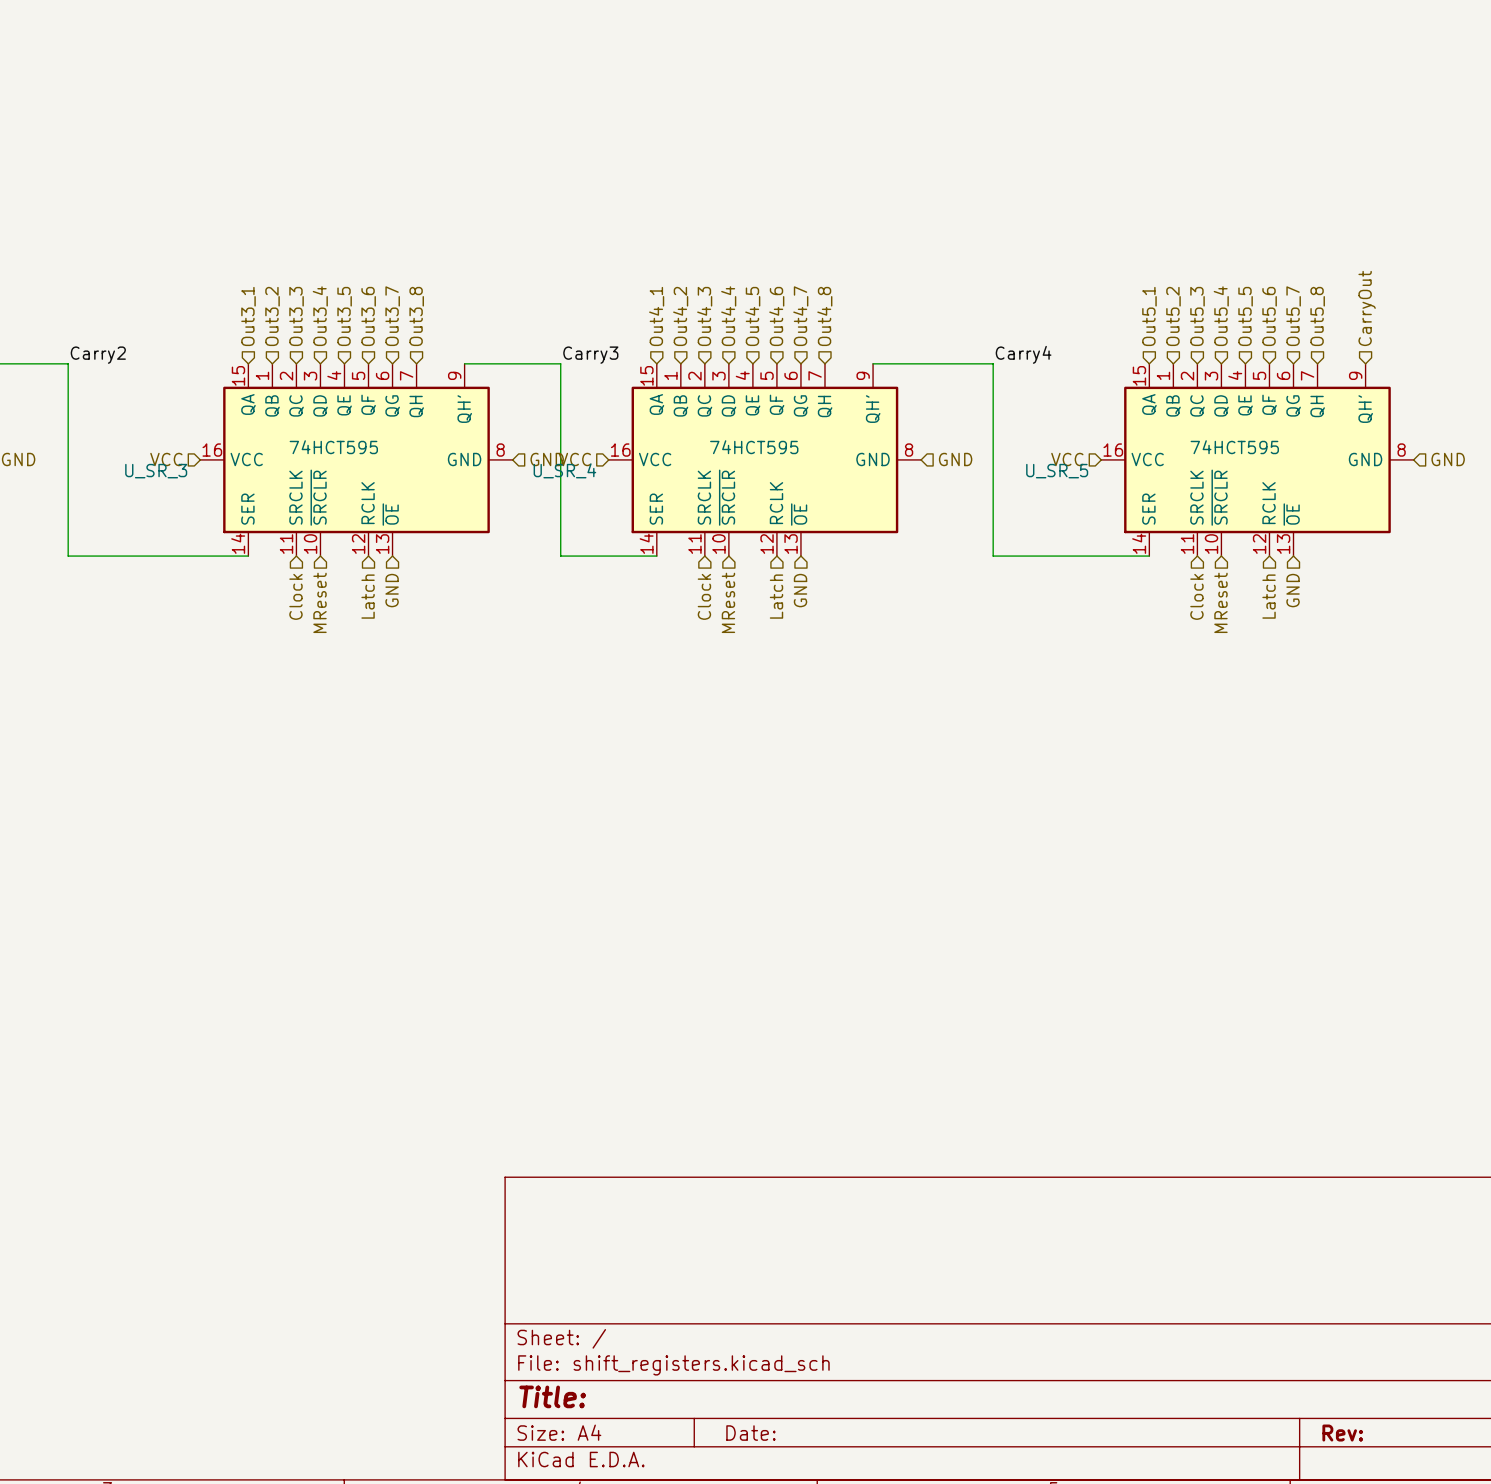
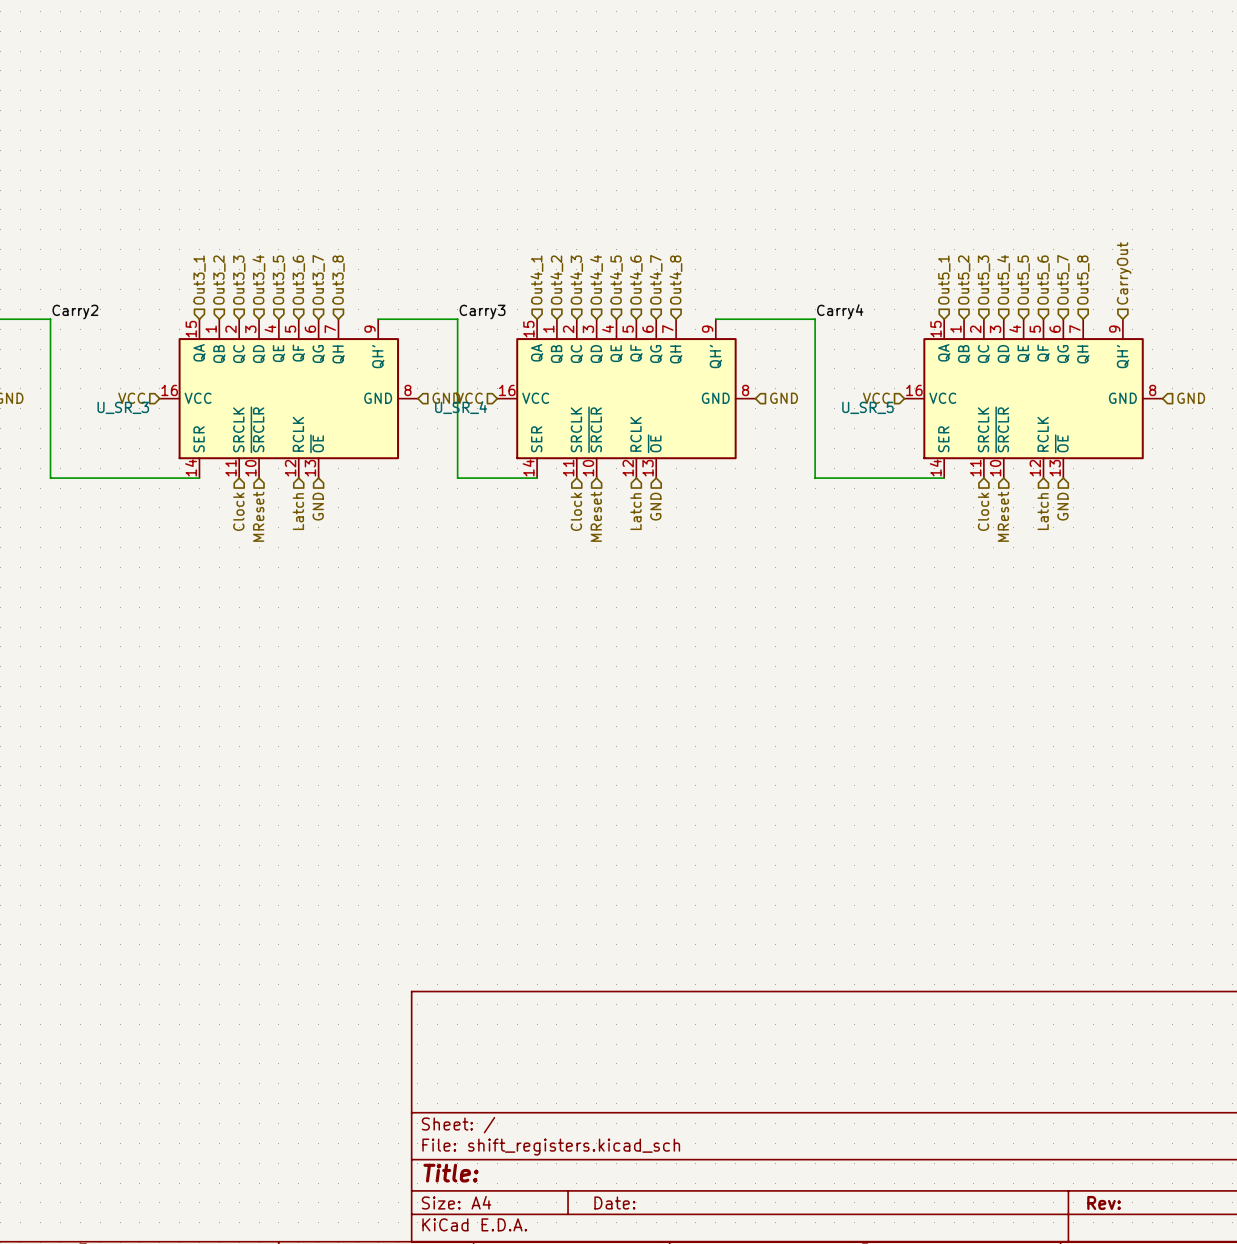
U_SR_3 value: 74HCT595 (333, 447) -> none
U_SR_4 value: 74HCT595 (754, 447) -> none
U_SR_5 value: 74HCT595 (1234, 447) -> none

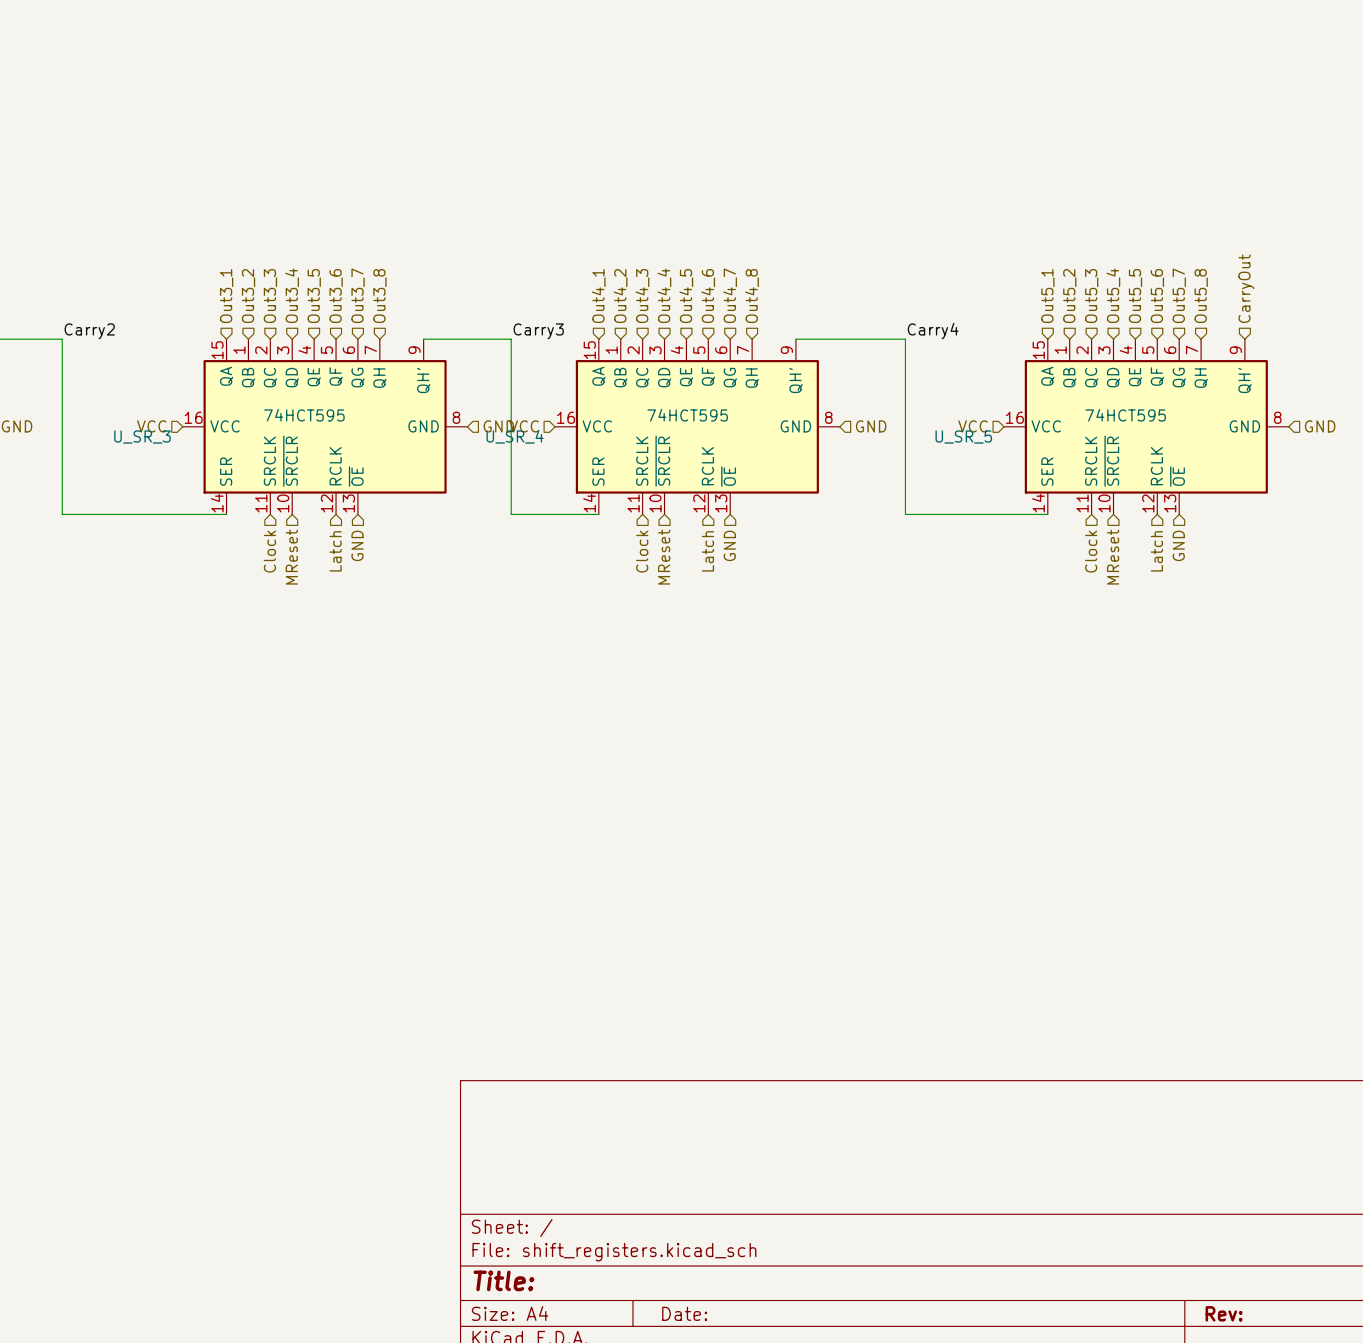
U_SR_3 value: none -> 74HCT595 (304, 415)
U_SR_4 value: none -> 74HCT595 (687, 415)
U_SR_5 value: none -> 74HCT595 (1125, 415)

